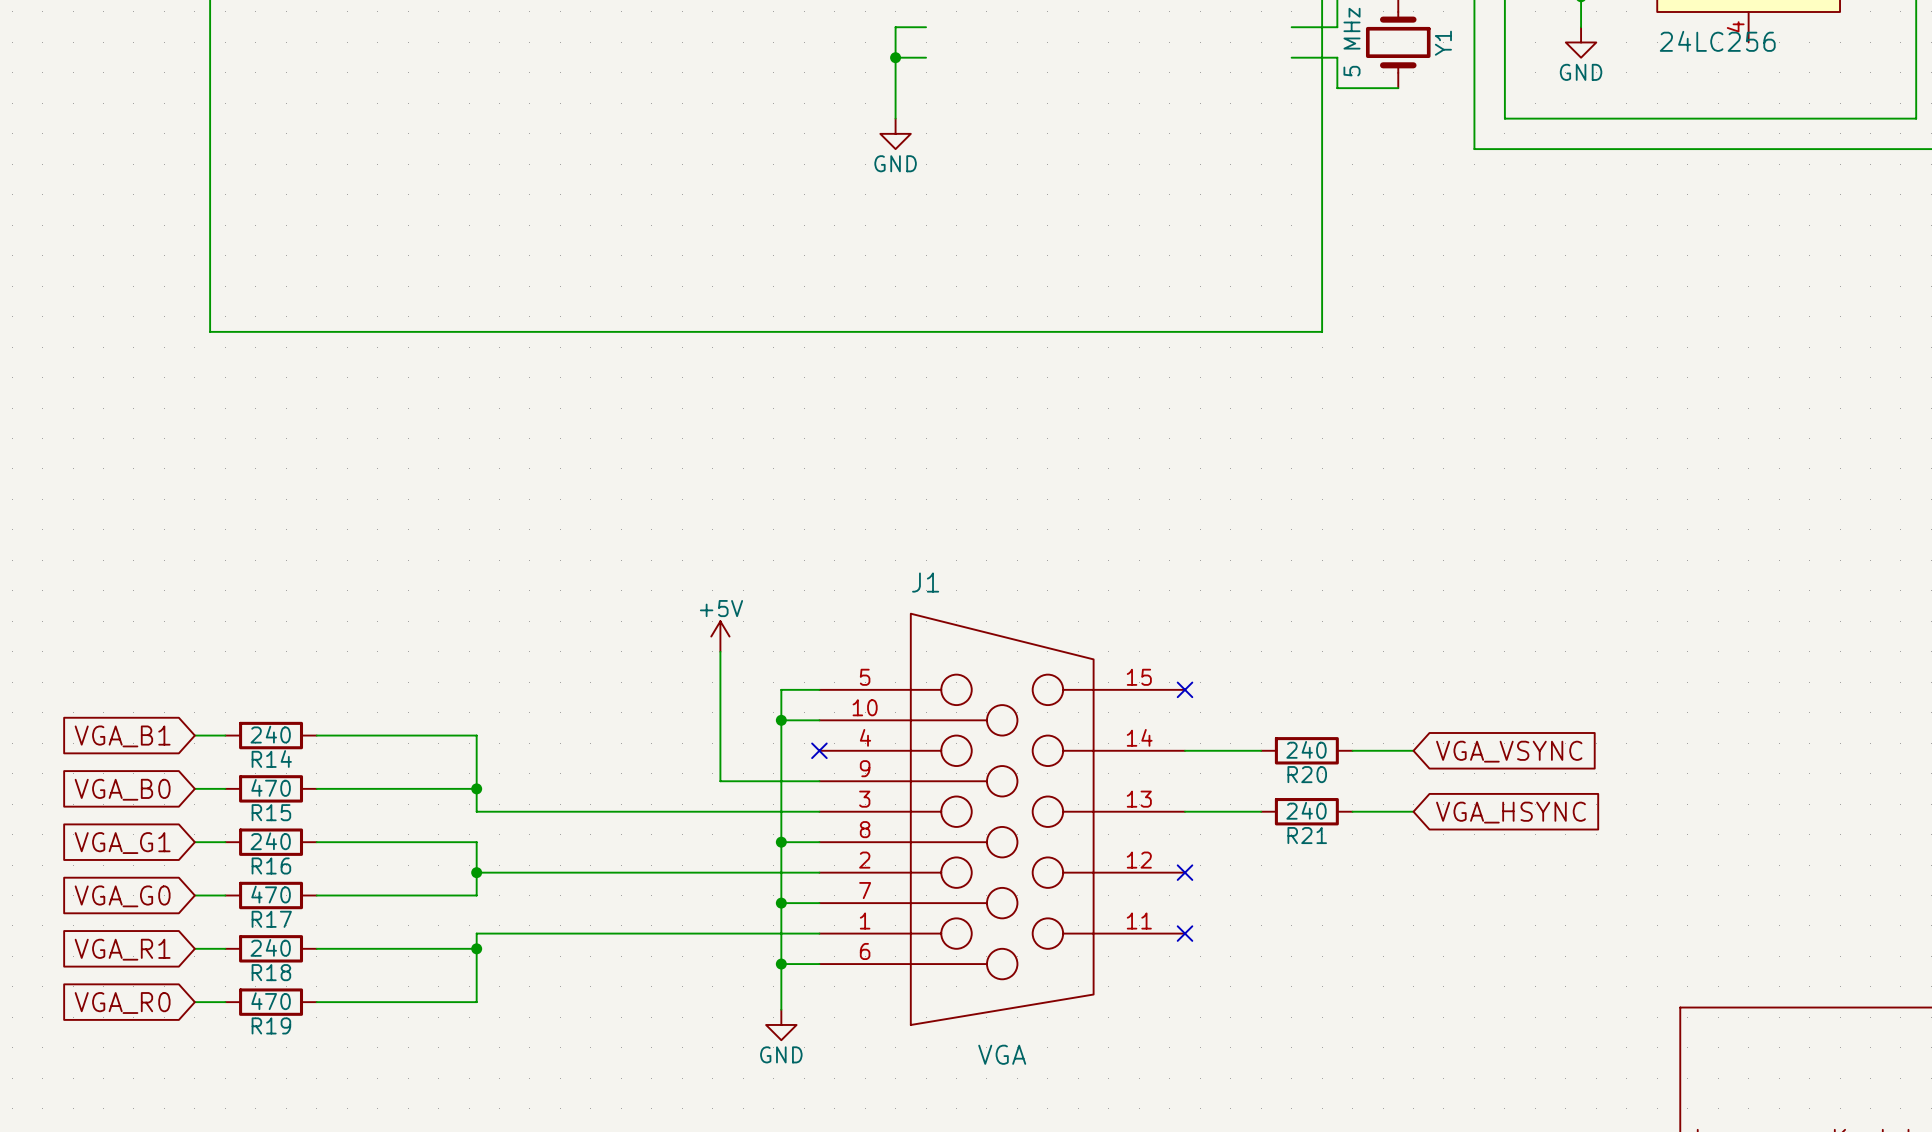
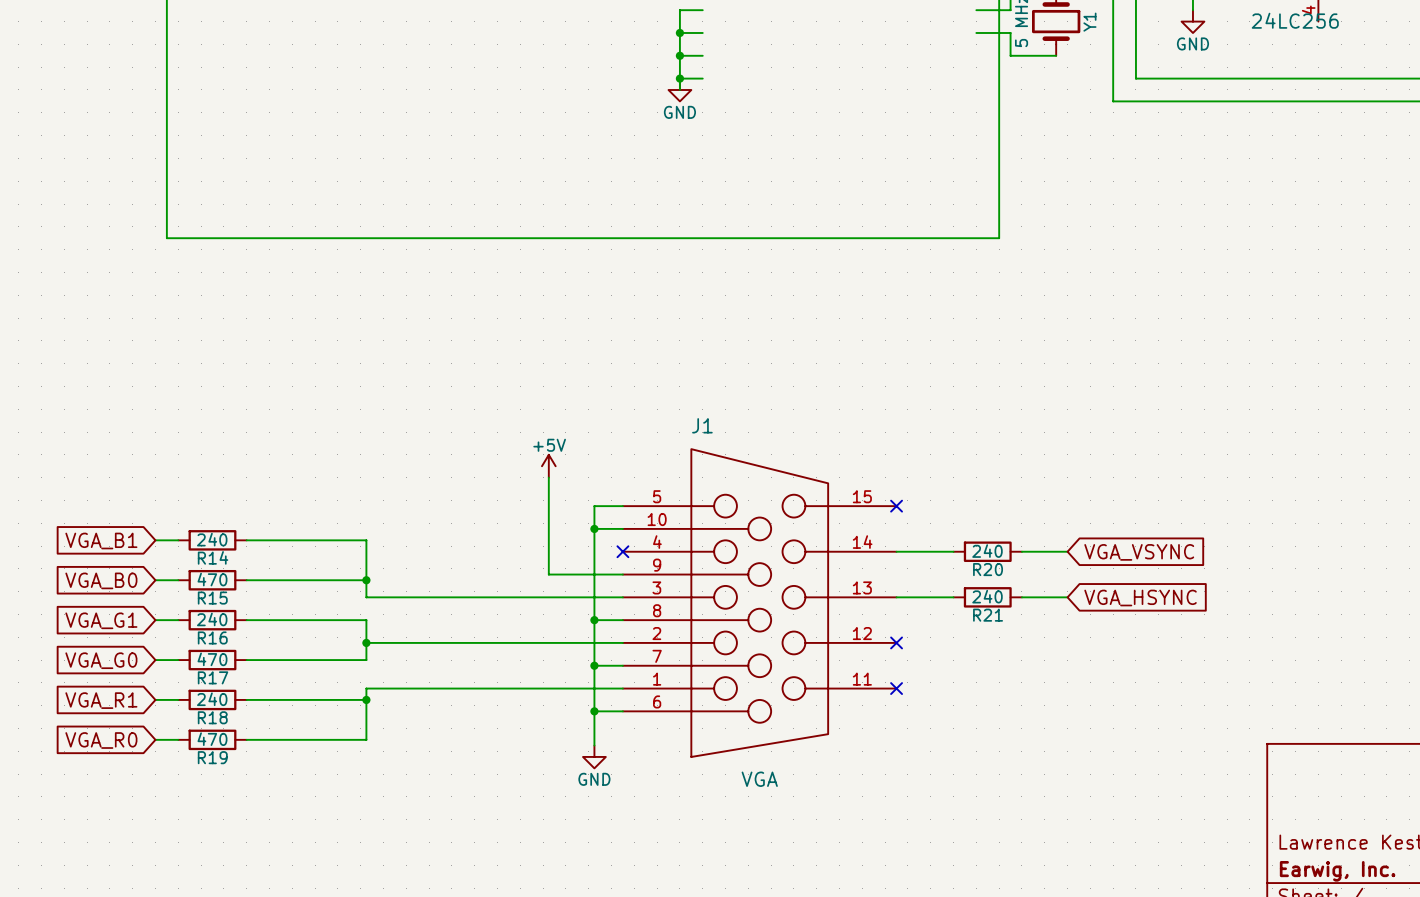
wire: none -> (679, 55) (702, 55)
junction: none -> (679, 55)
junction: none -> (679, 78)
wire: none -> (702, 78) (679, 78) (679, 89)

